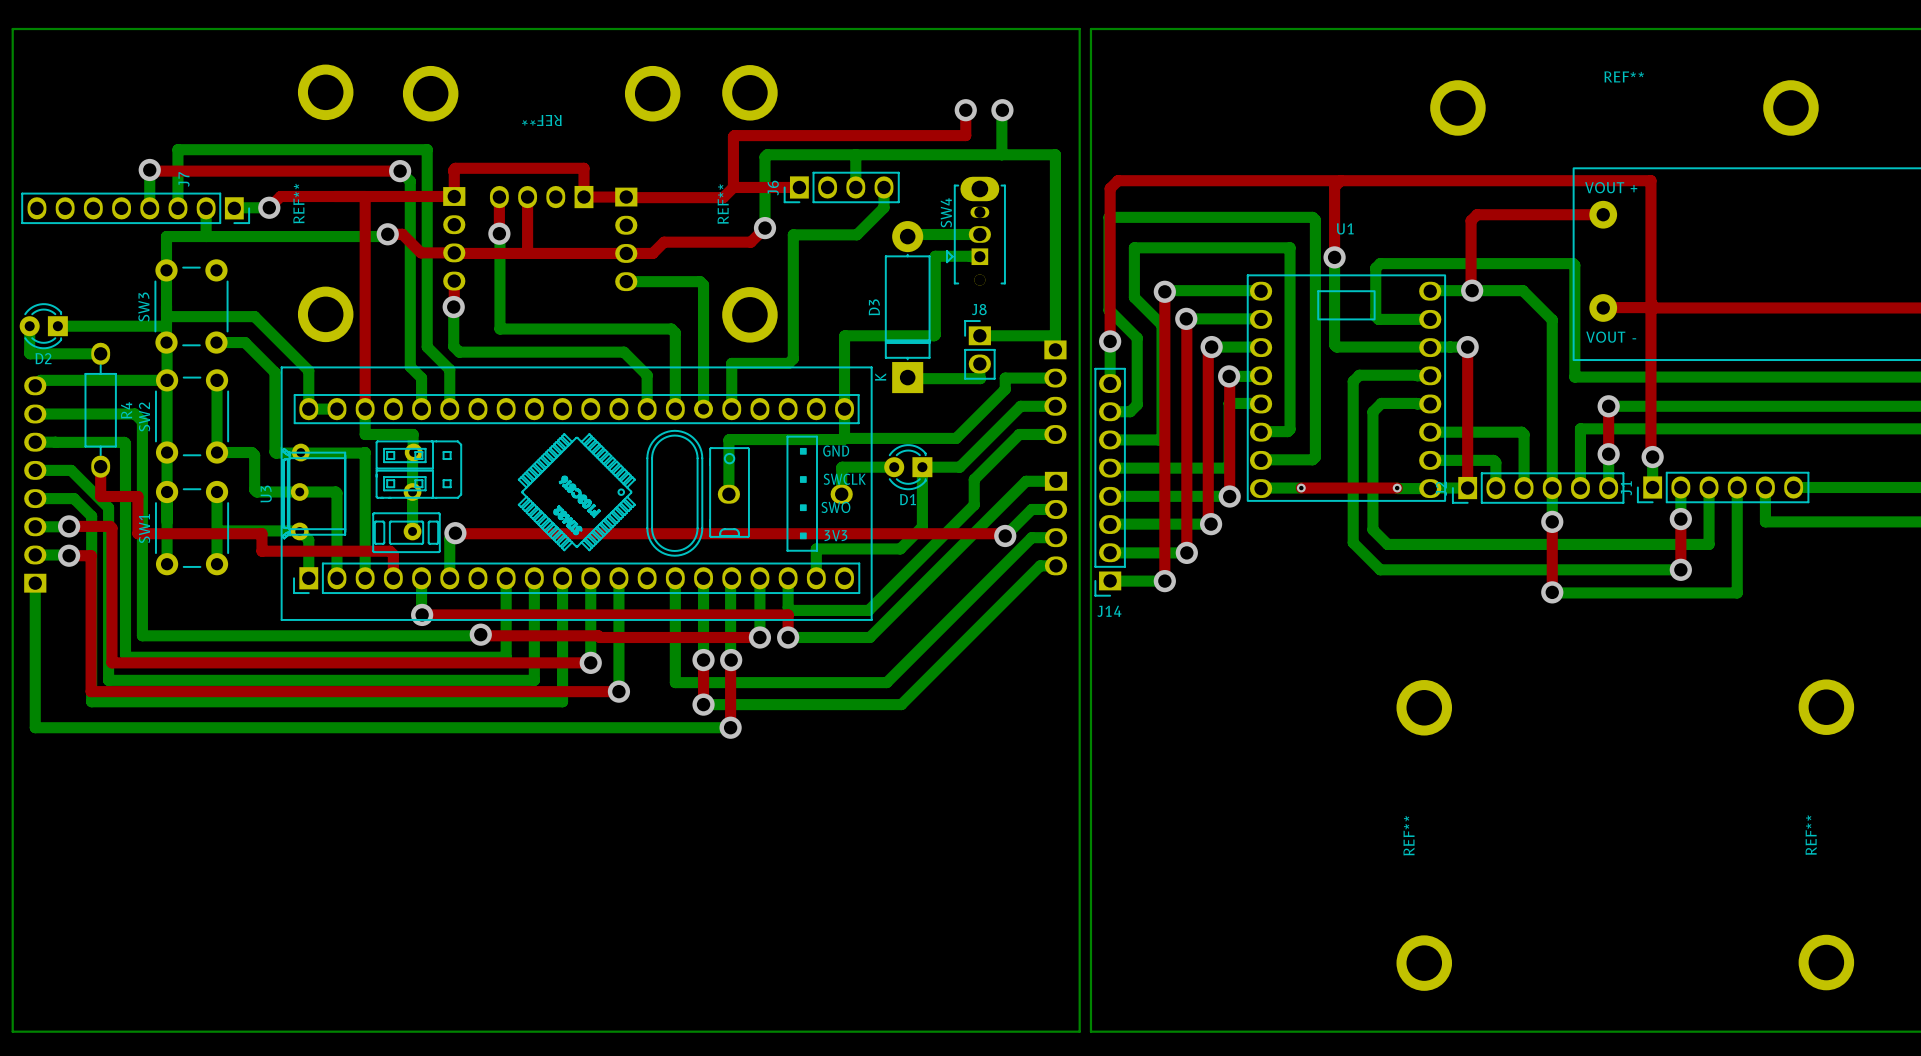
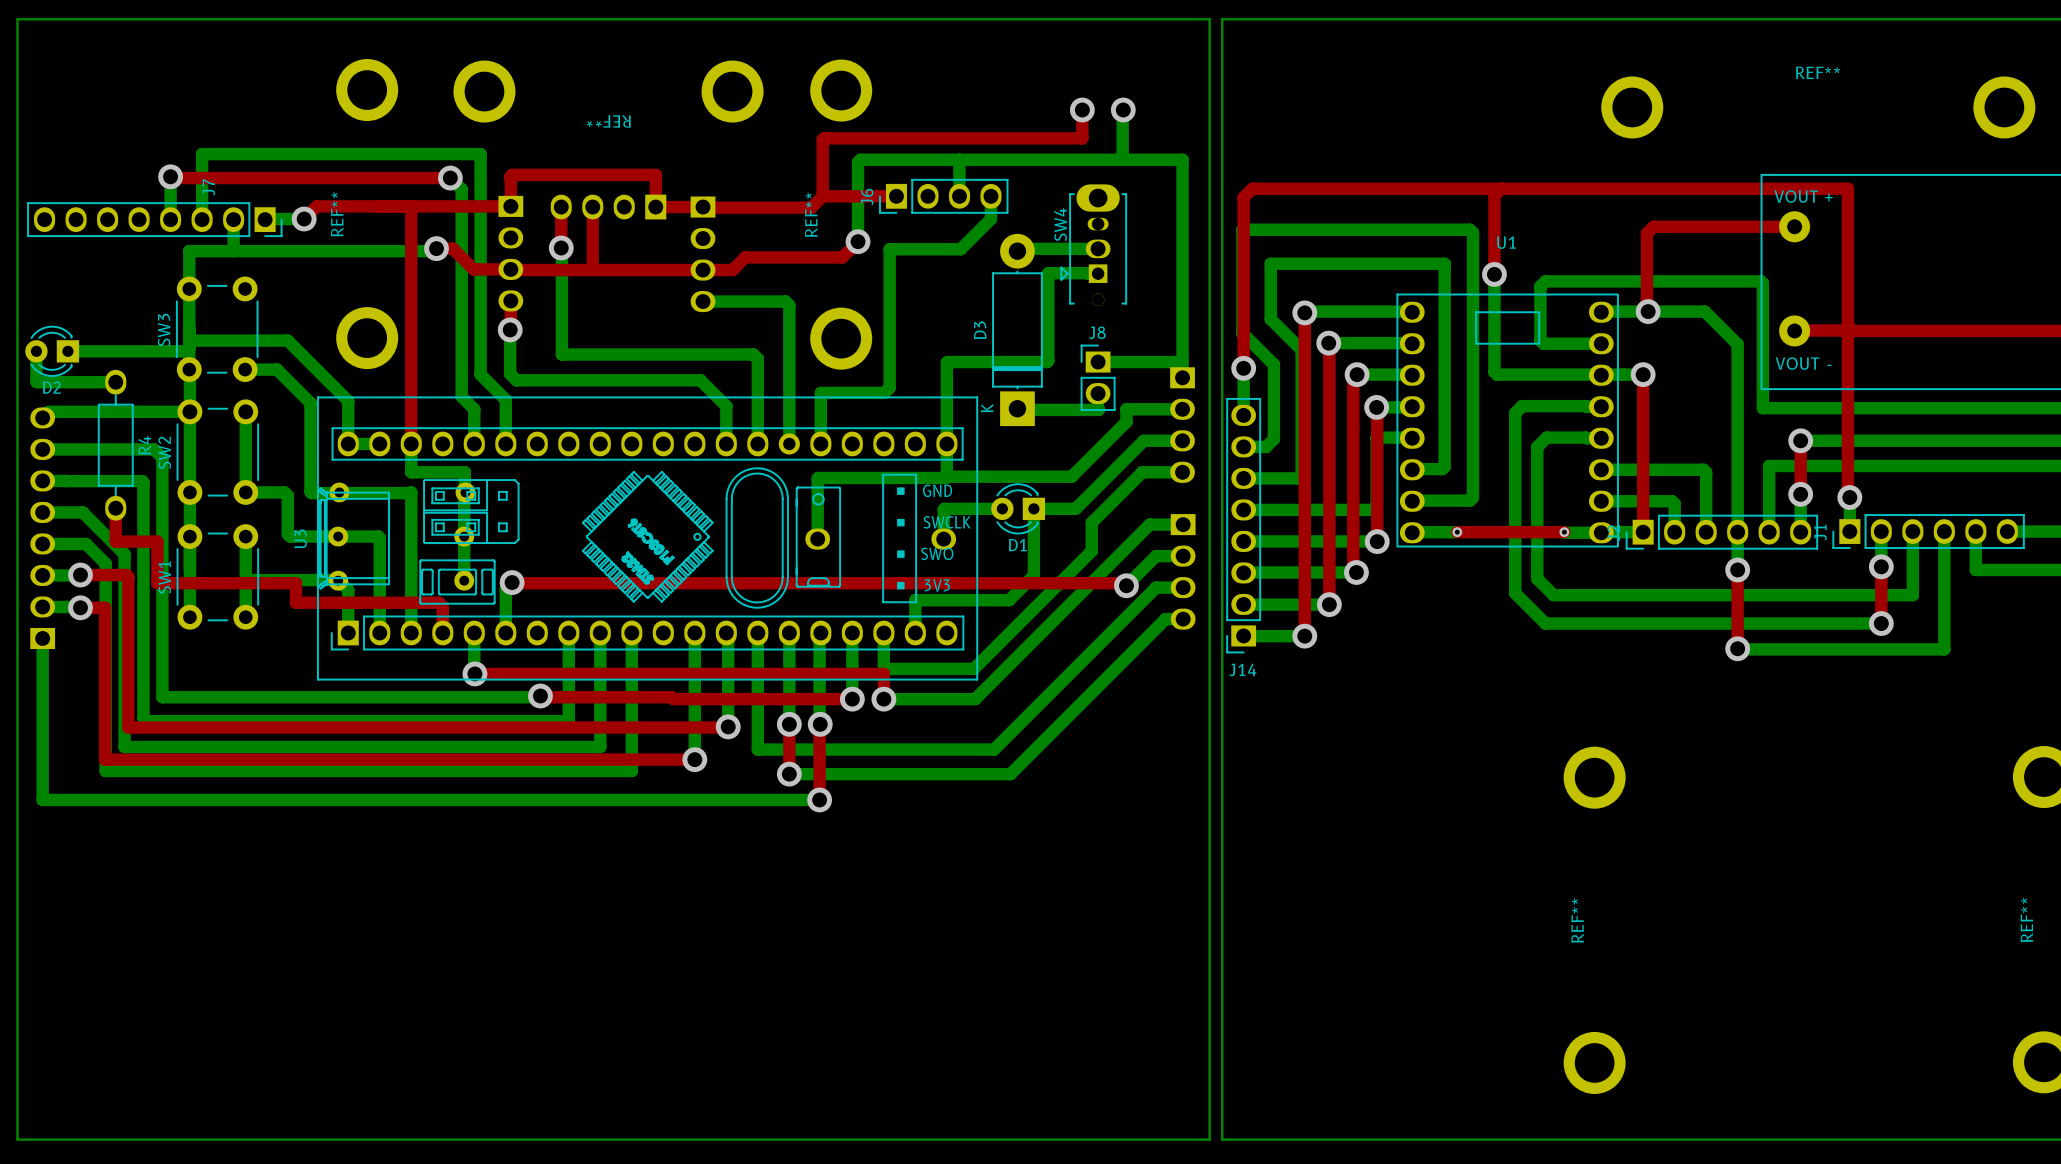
bottom track: (590, 578) (590, 662) -> none
bottom track: none -> (726, 632) (728, 634) (728, 726)
via position: (590, 662) -> (728, 726)
top track: none -> (728, 726) (663, 727)

